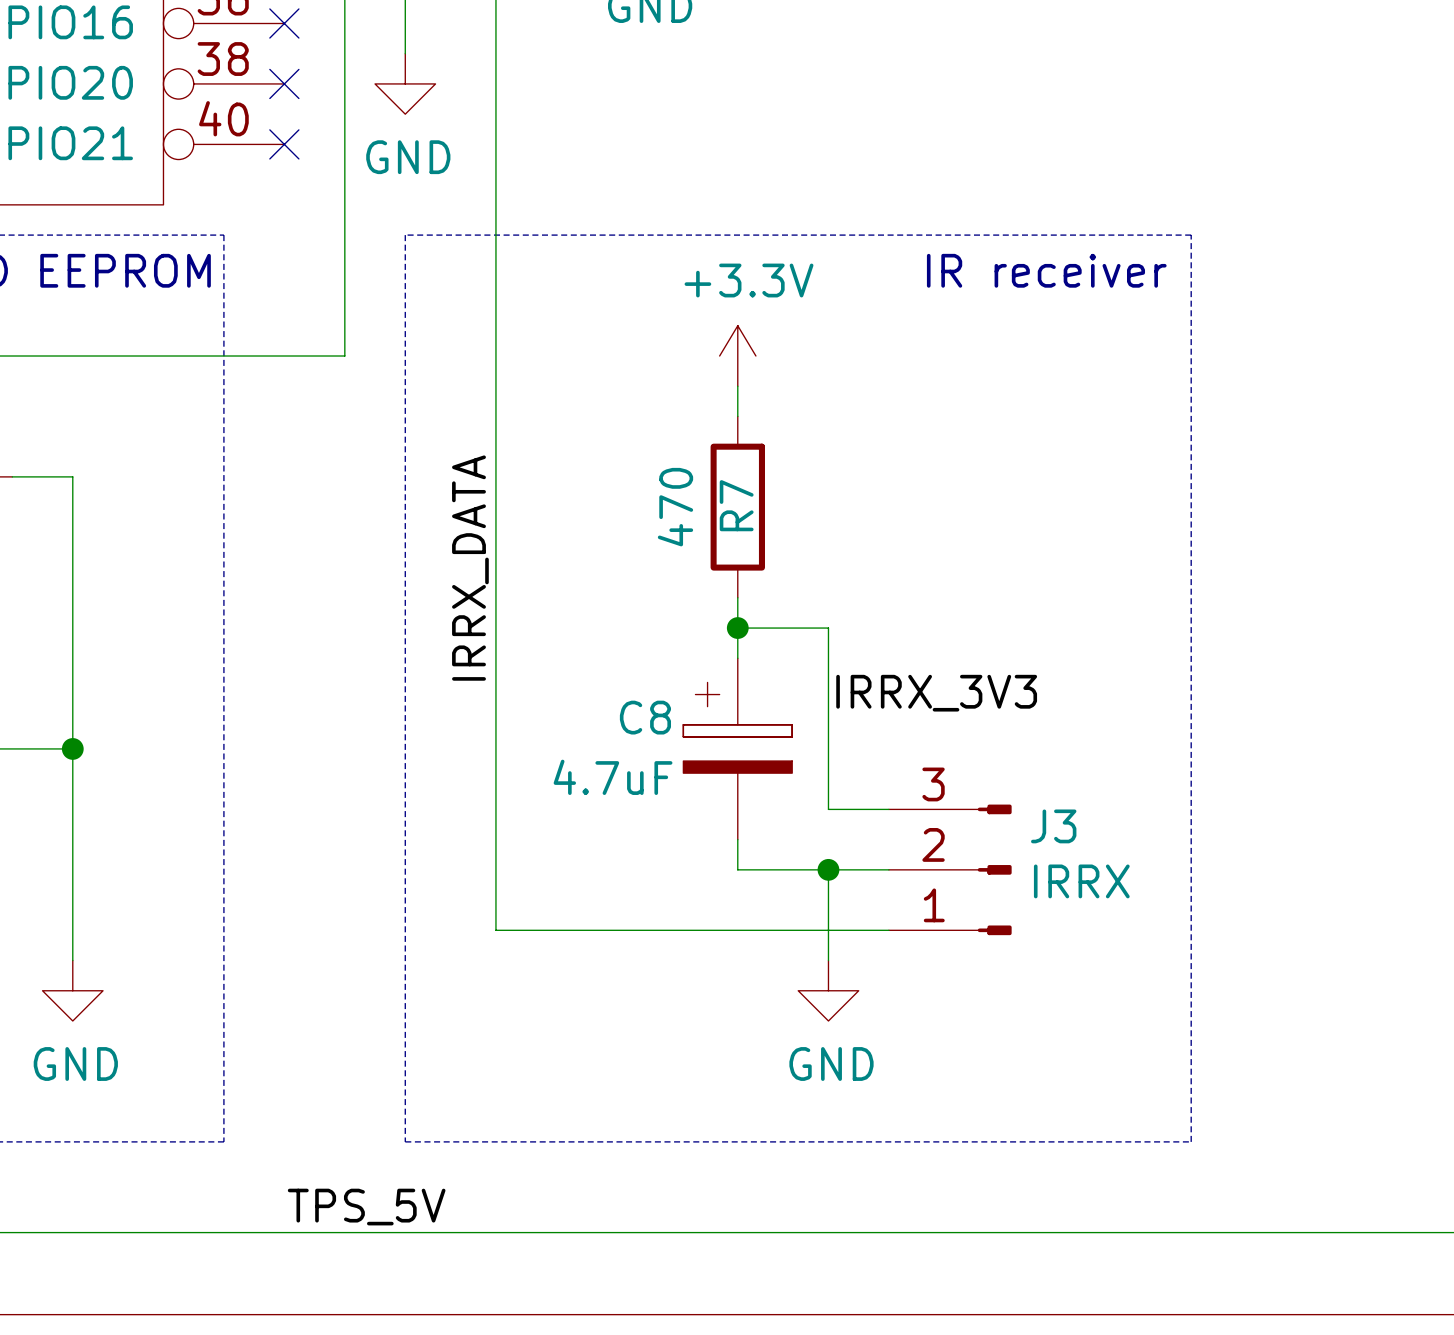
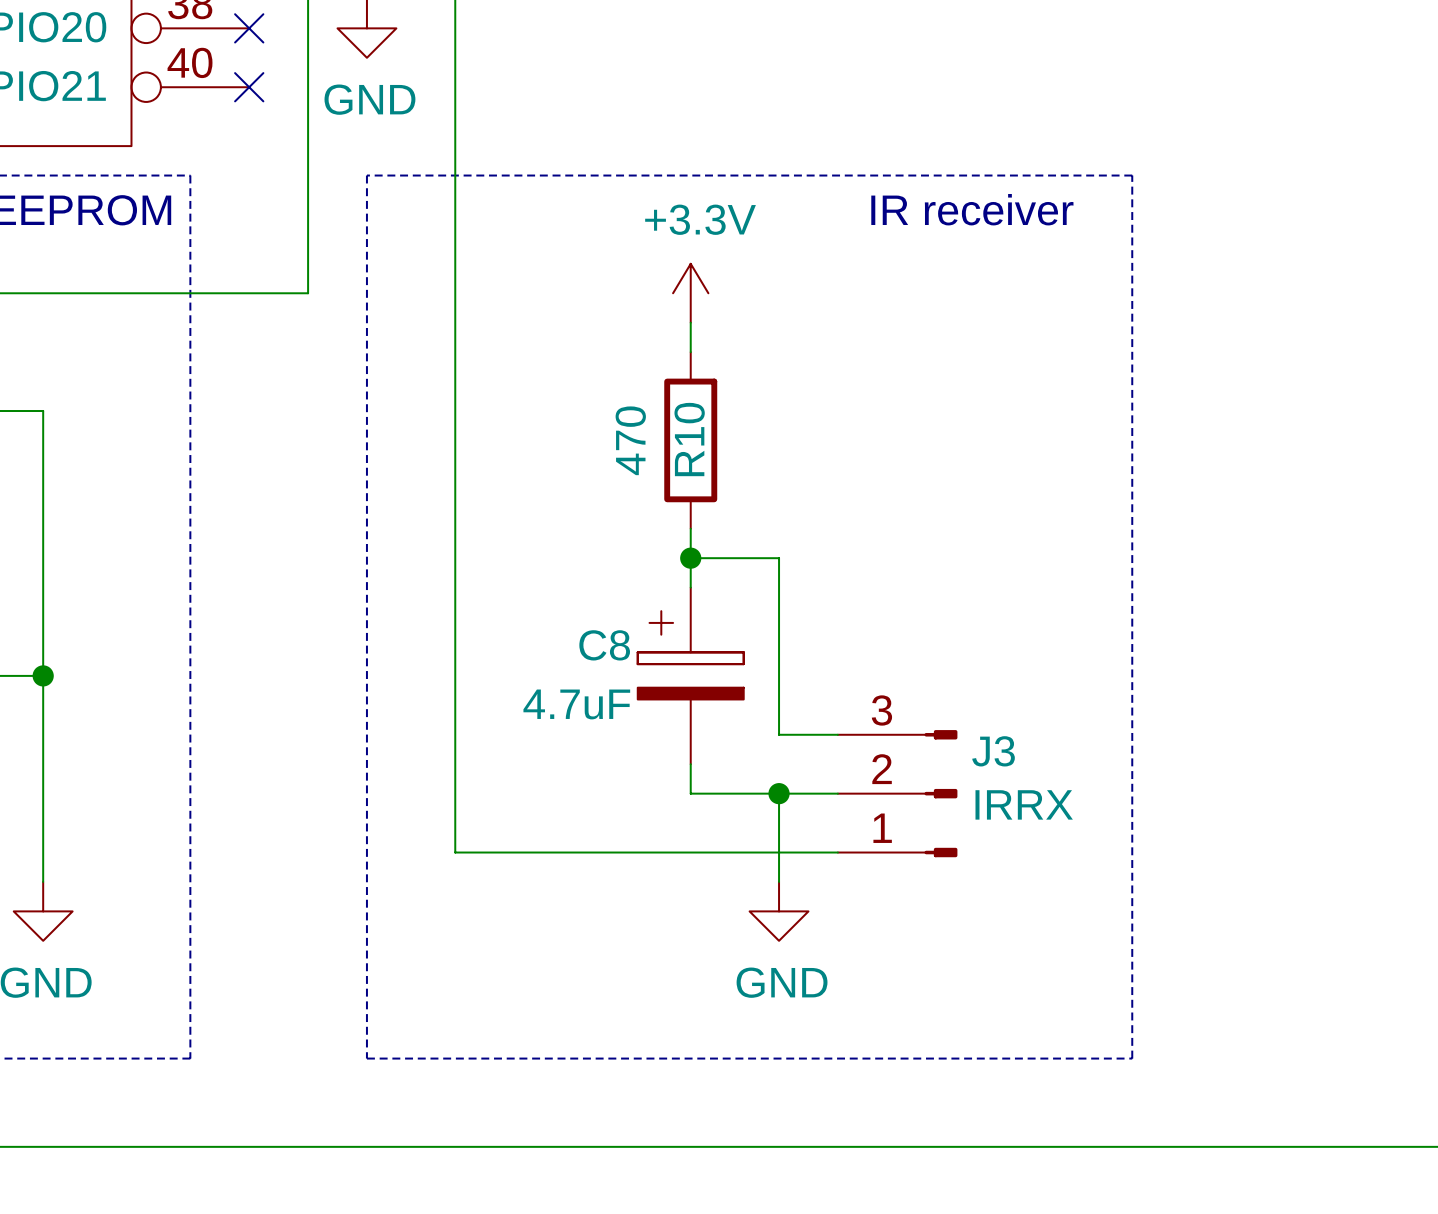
R7 name: R7 (736, 505) -> R10 (689, 439)
label: IRRX_DATA (470, 568) -> none
label: IRRX_3V3 (936, 693) -> none
label: TPS_5V (366, 1207) -> none

